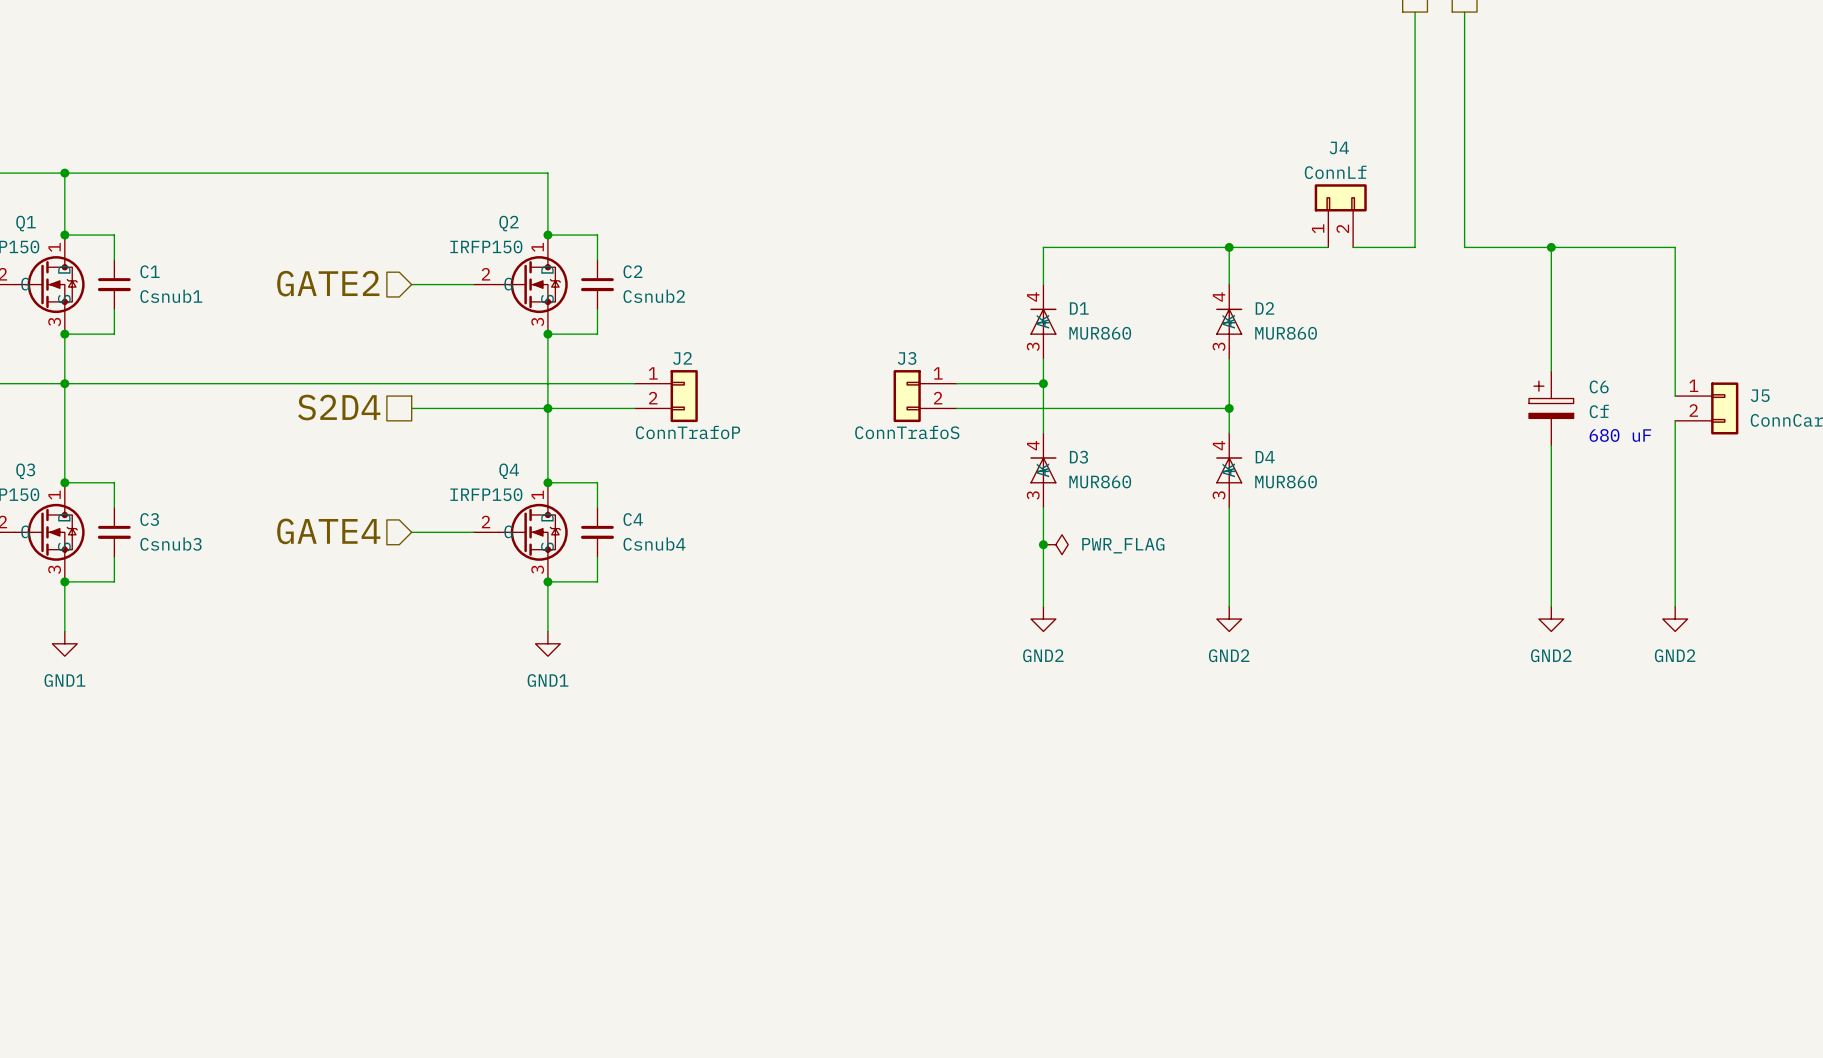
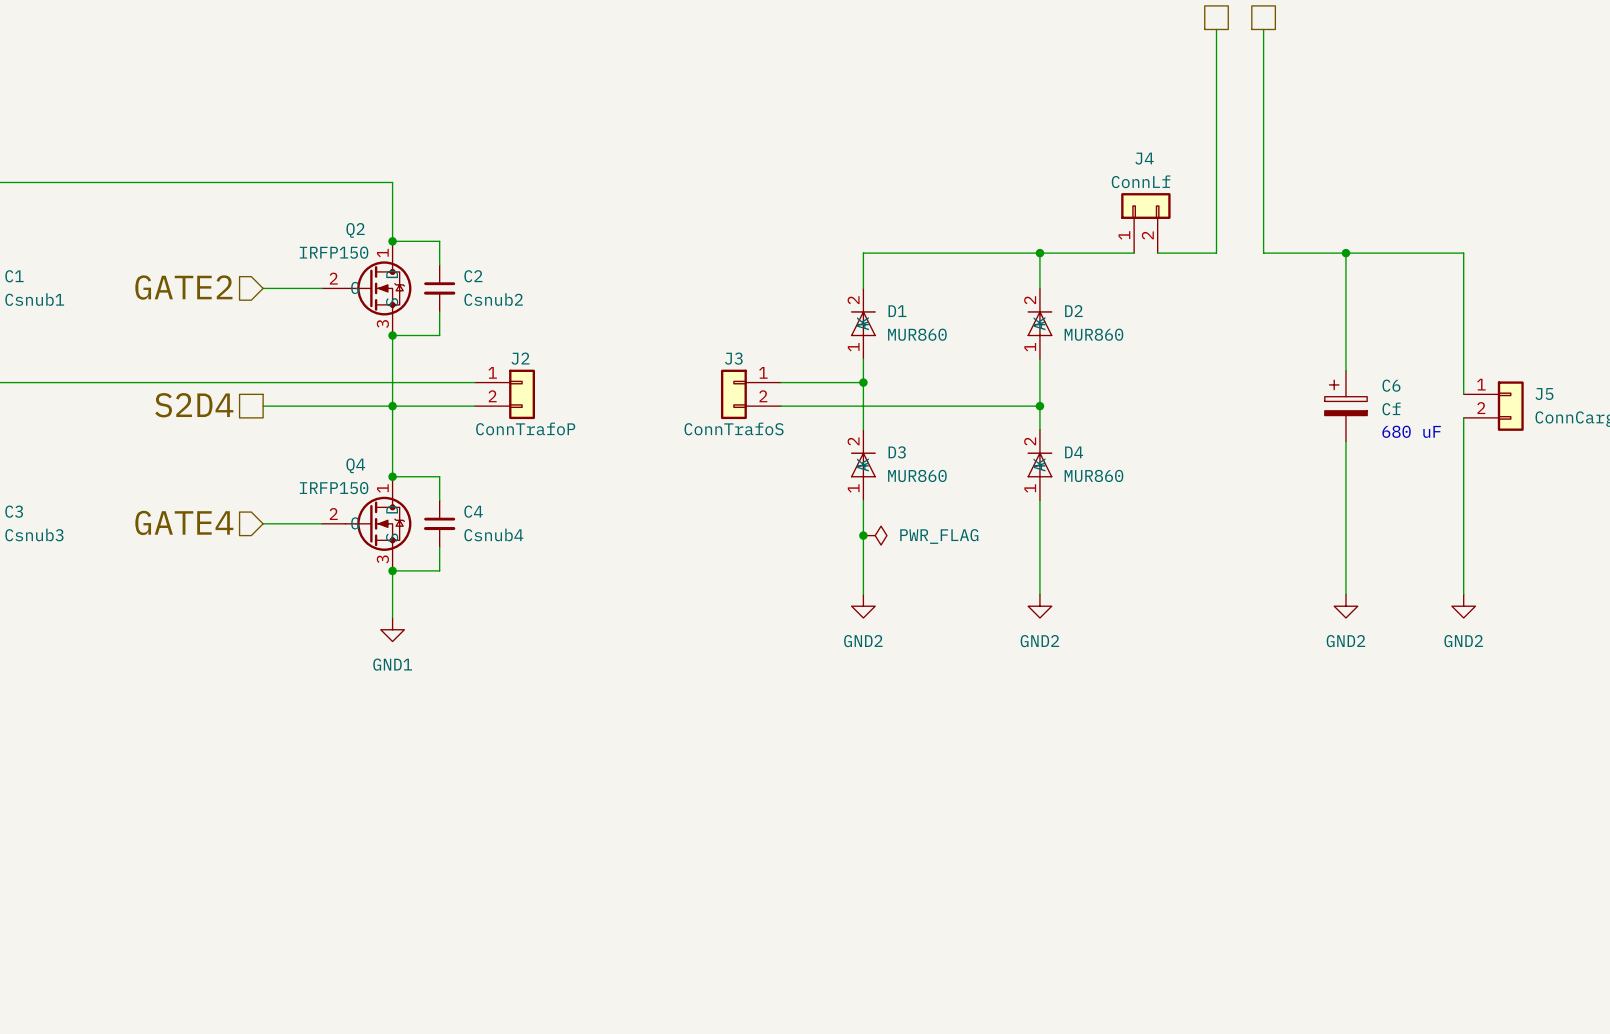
D1 pin number: 4 (1033, 297) -> 2 (853, 300)
D2 pin number: 4 (1219, 297) -> 2 (1030, 300)
D1 pin number: 3 (1033, 346) -> 1 (853, 347)
D2 pin number: 3 (1219, 346) -> 1 (1030, 347)
D3 pin number: 4 (1033, 445) -> 2 (853, 441)
D4 pin number: 4 (1219, 445) -> 2 (1030, 441)
D3 pin number: 3 (1033, 495) -> 1 (853, 488)
D4 pin number: 3 (1219, 495) -> 1 (1030, 488)

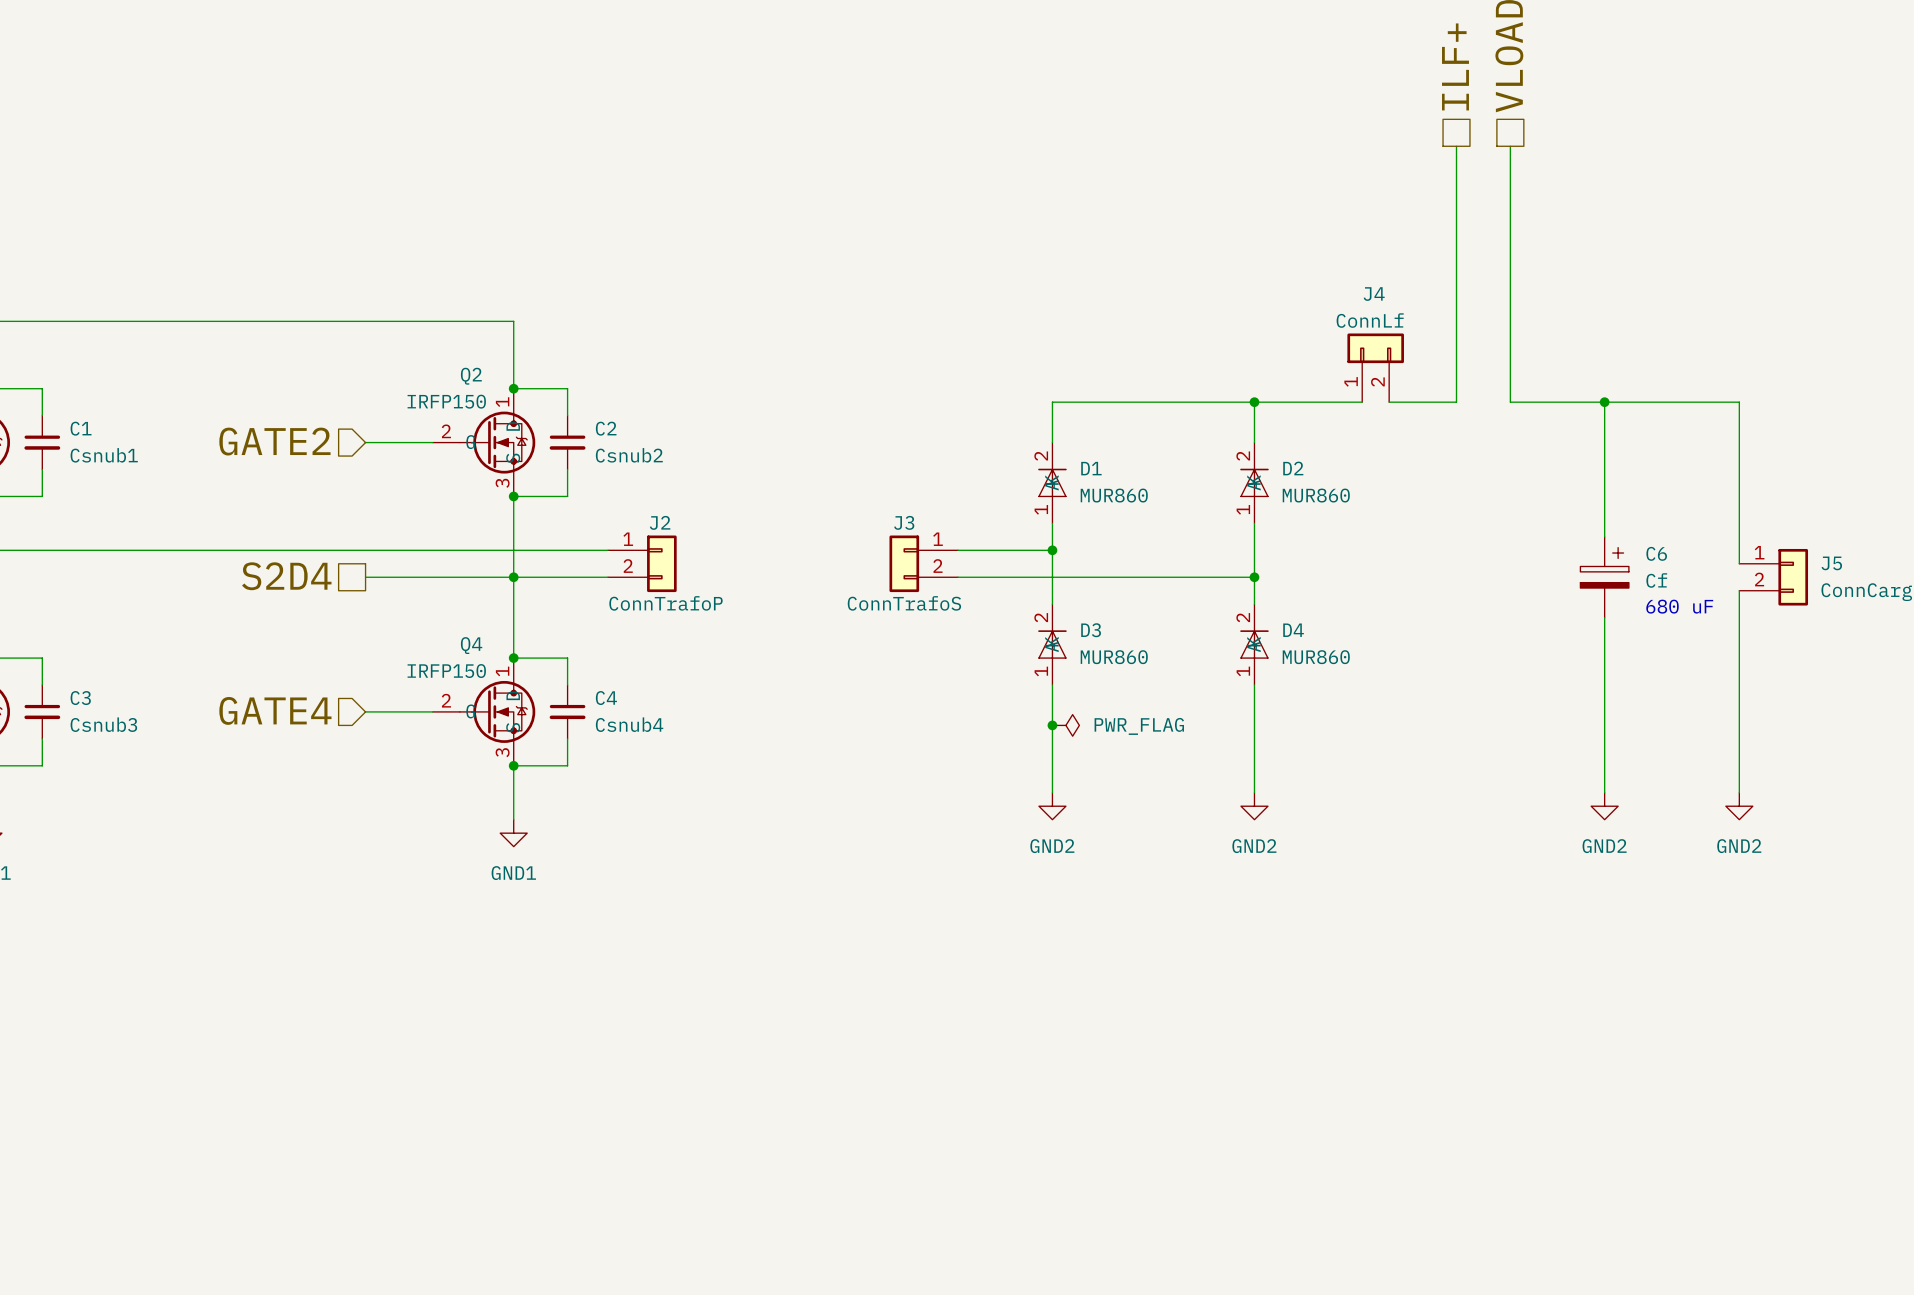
C6 flip: as is (1345, 397) -> left-right (1604, 567)

